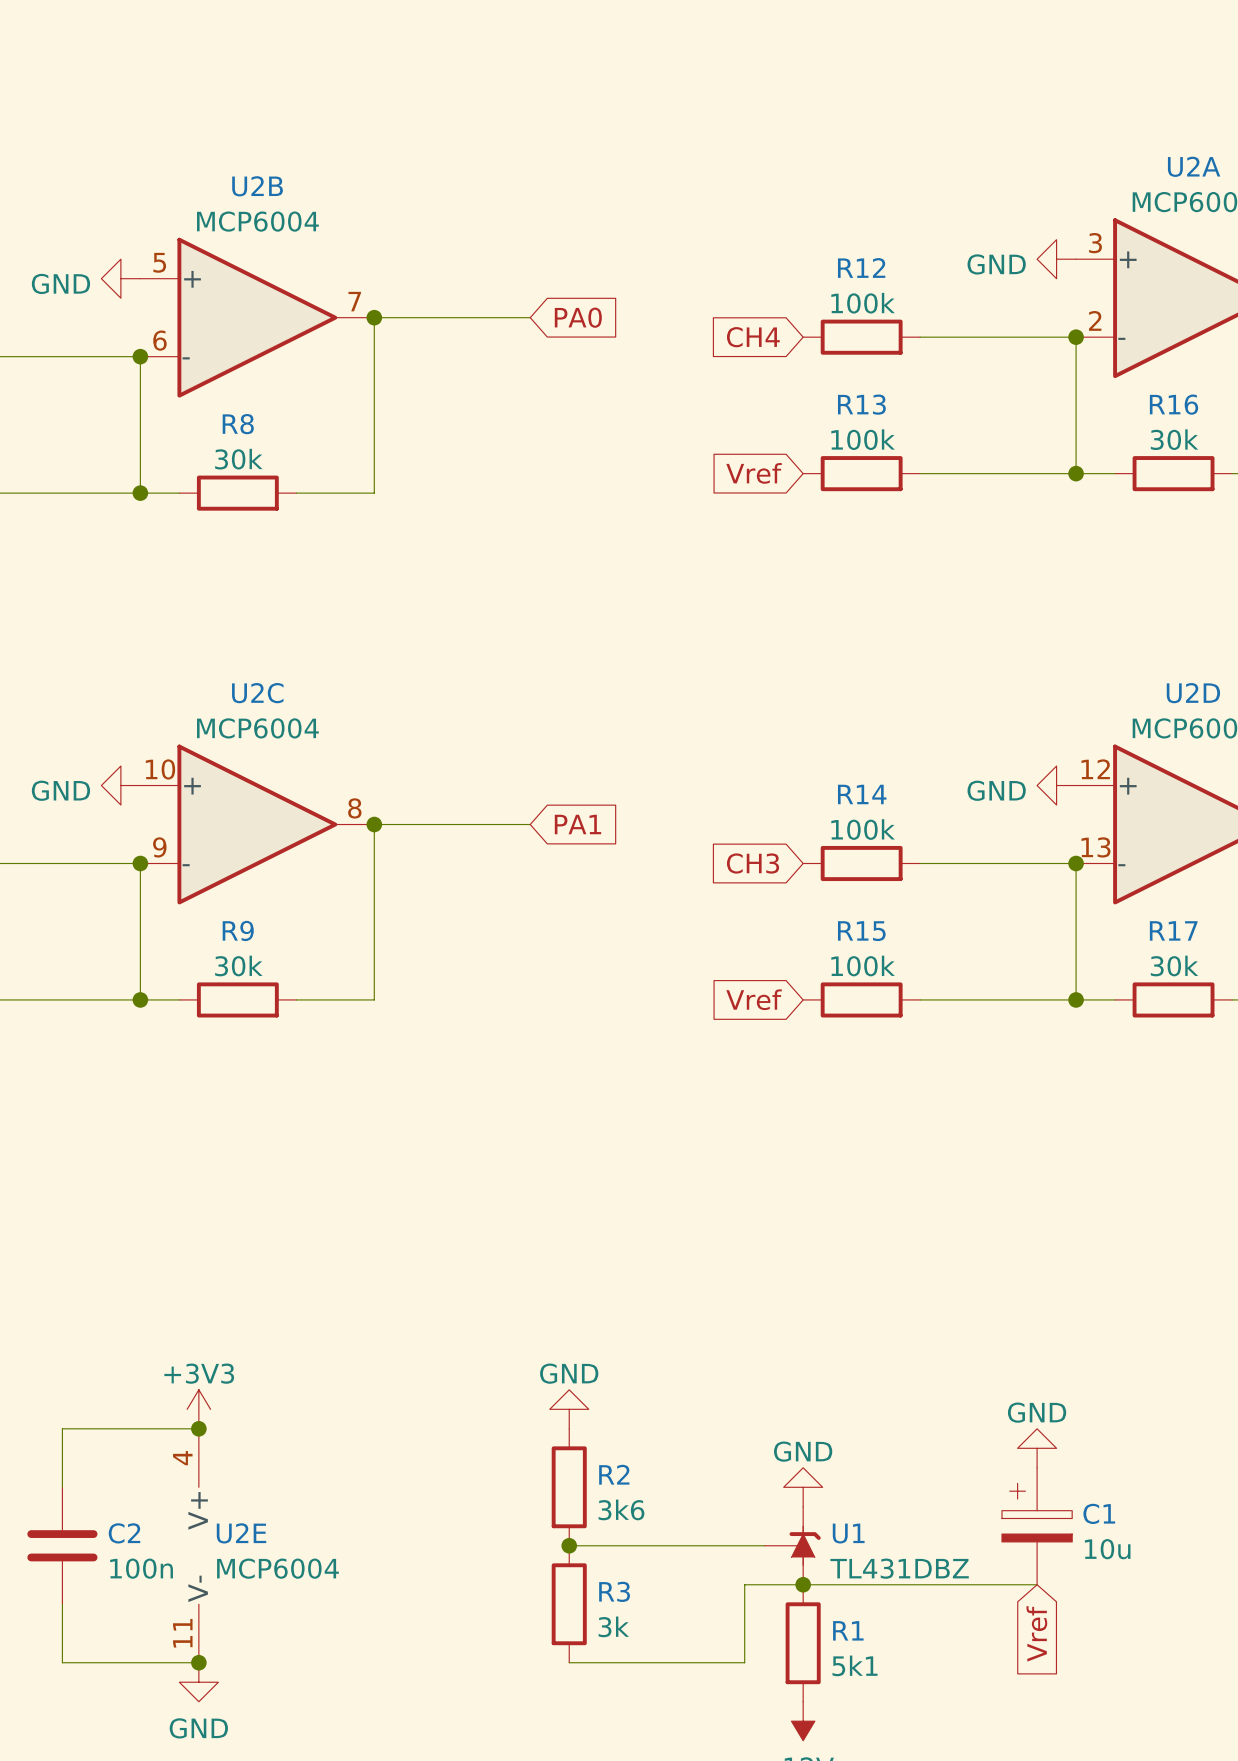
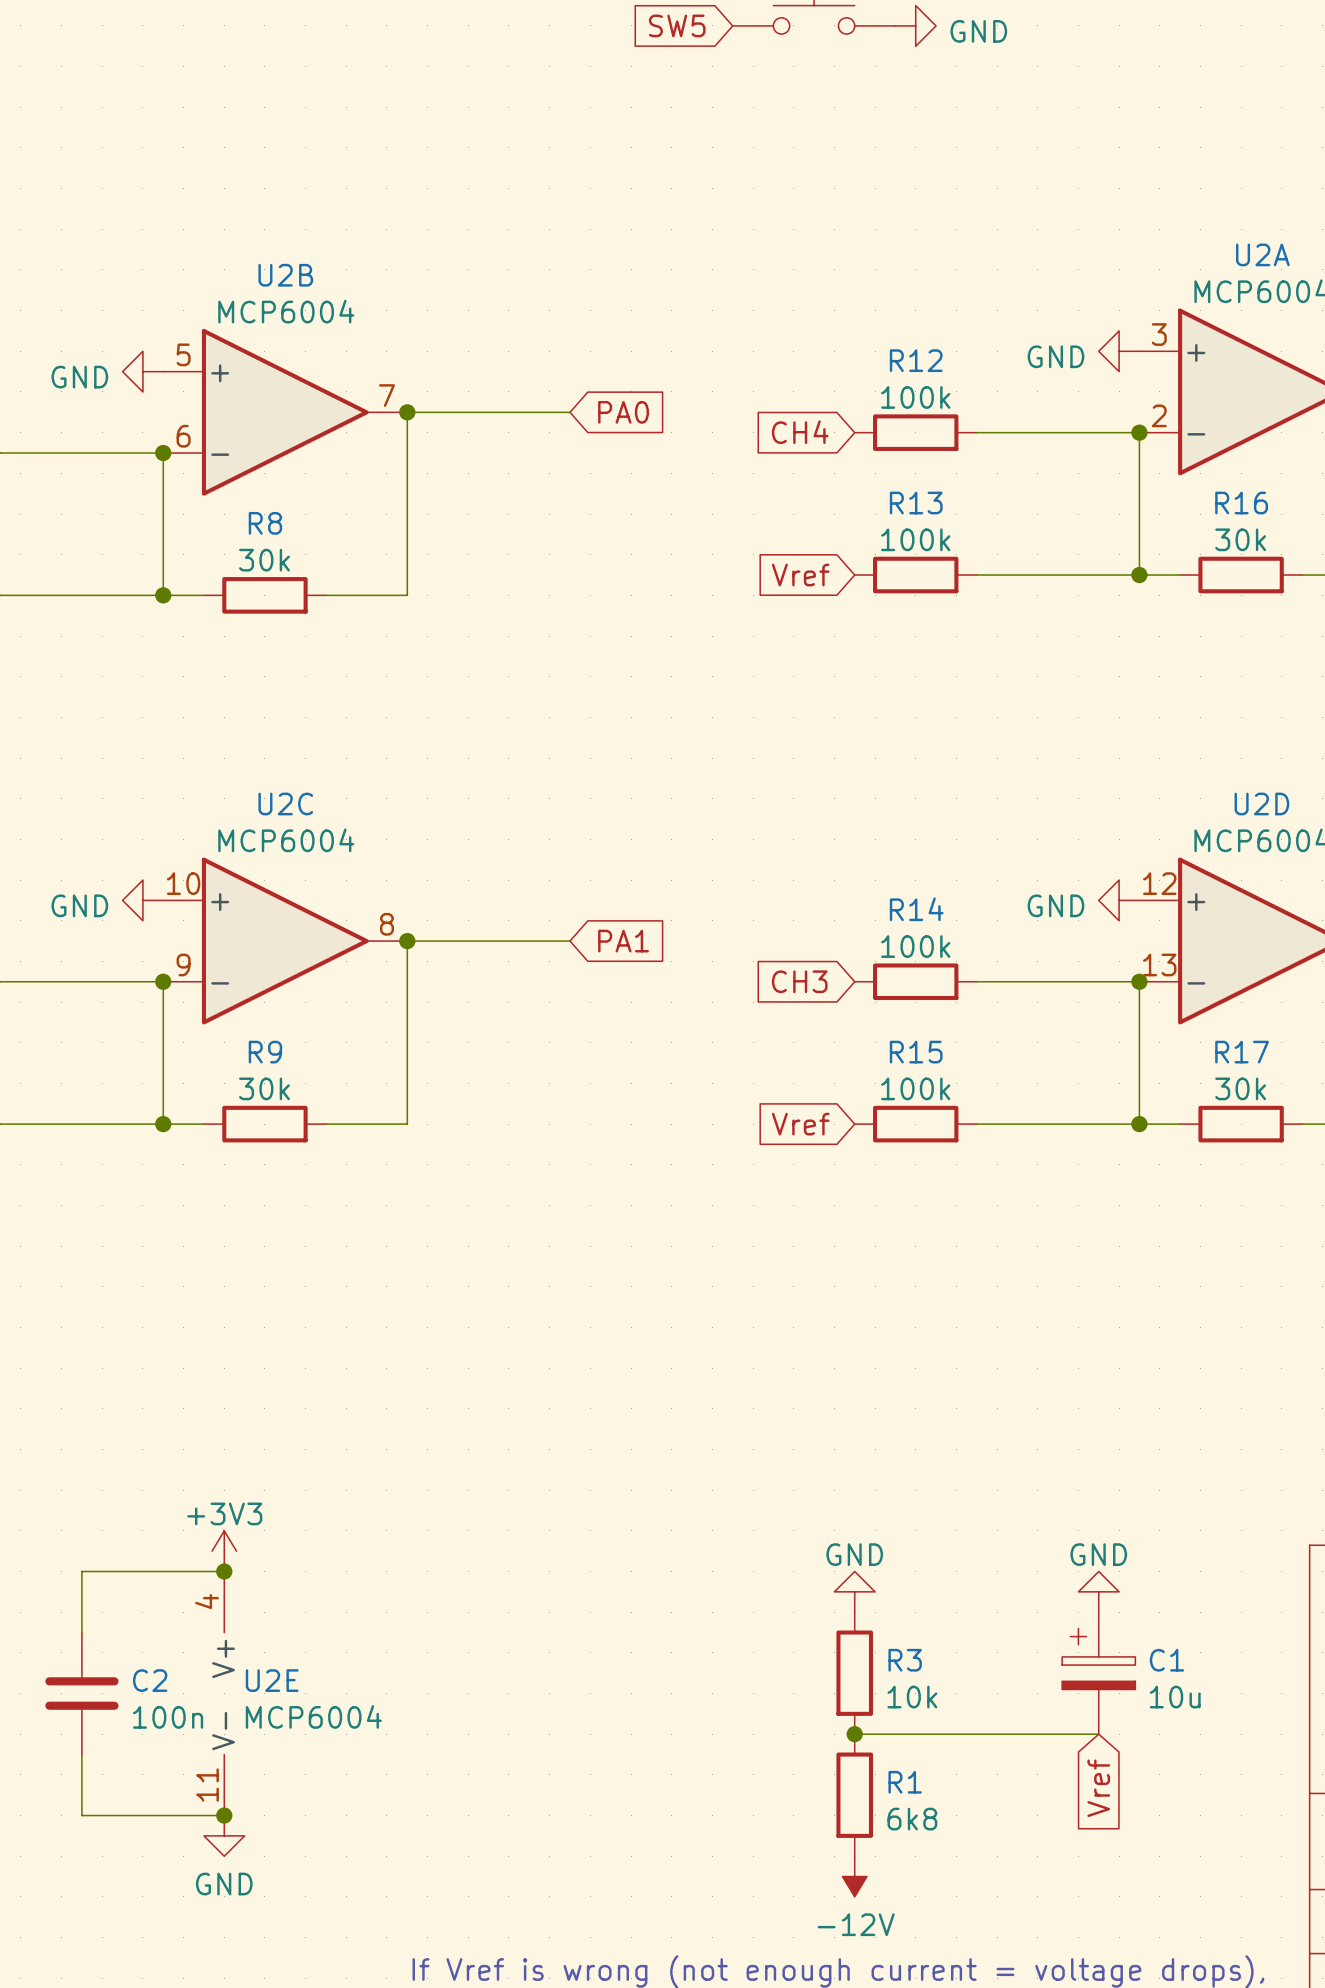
power symbol: GND (569, 1409) -> none
R2: 3k6 (569, 1487) -> none
power symbol position: GND (803, 1487) -> GND (854, 1591)
wire: (569, 1545) (764, 1545) -> none
junction: (569, 1545) -> none
U1: TL431DBZ (792, 1545) -> none
wire: (803, 1584) (744, 1584) (744, 1662) (569, 1662) -> none
R3 position: (569, 1604) -> (854, 1673)
R3 value: 3k (613, 1626) -> 10k (912, 1697)
R1 value: 5k1 (855, 1665) -> 6k8 (912, 1819)

